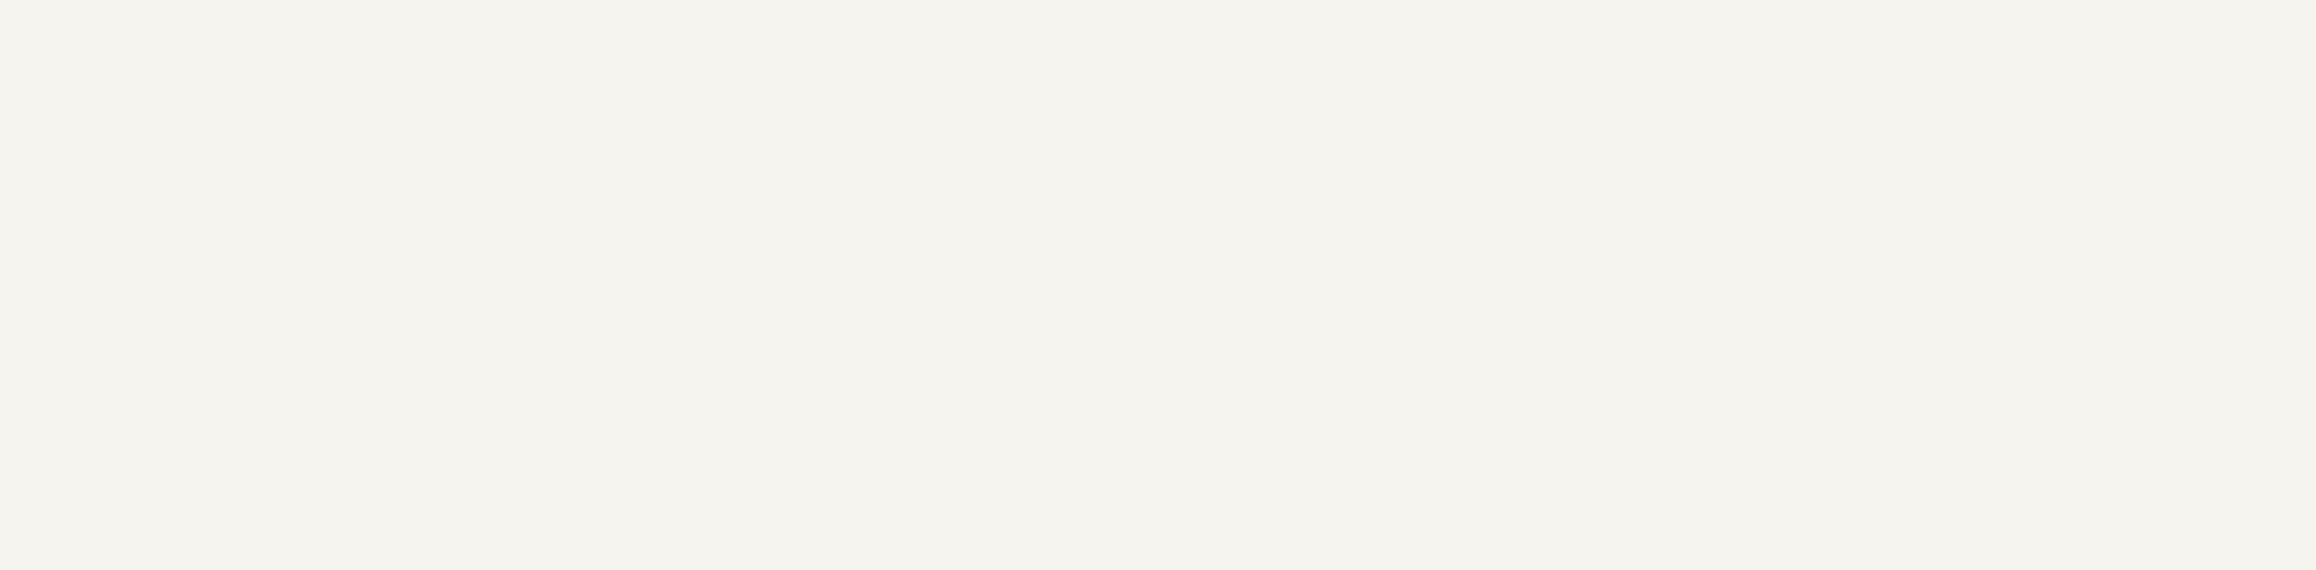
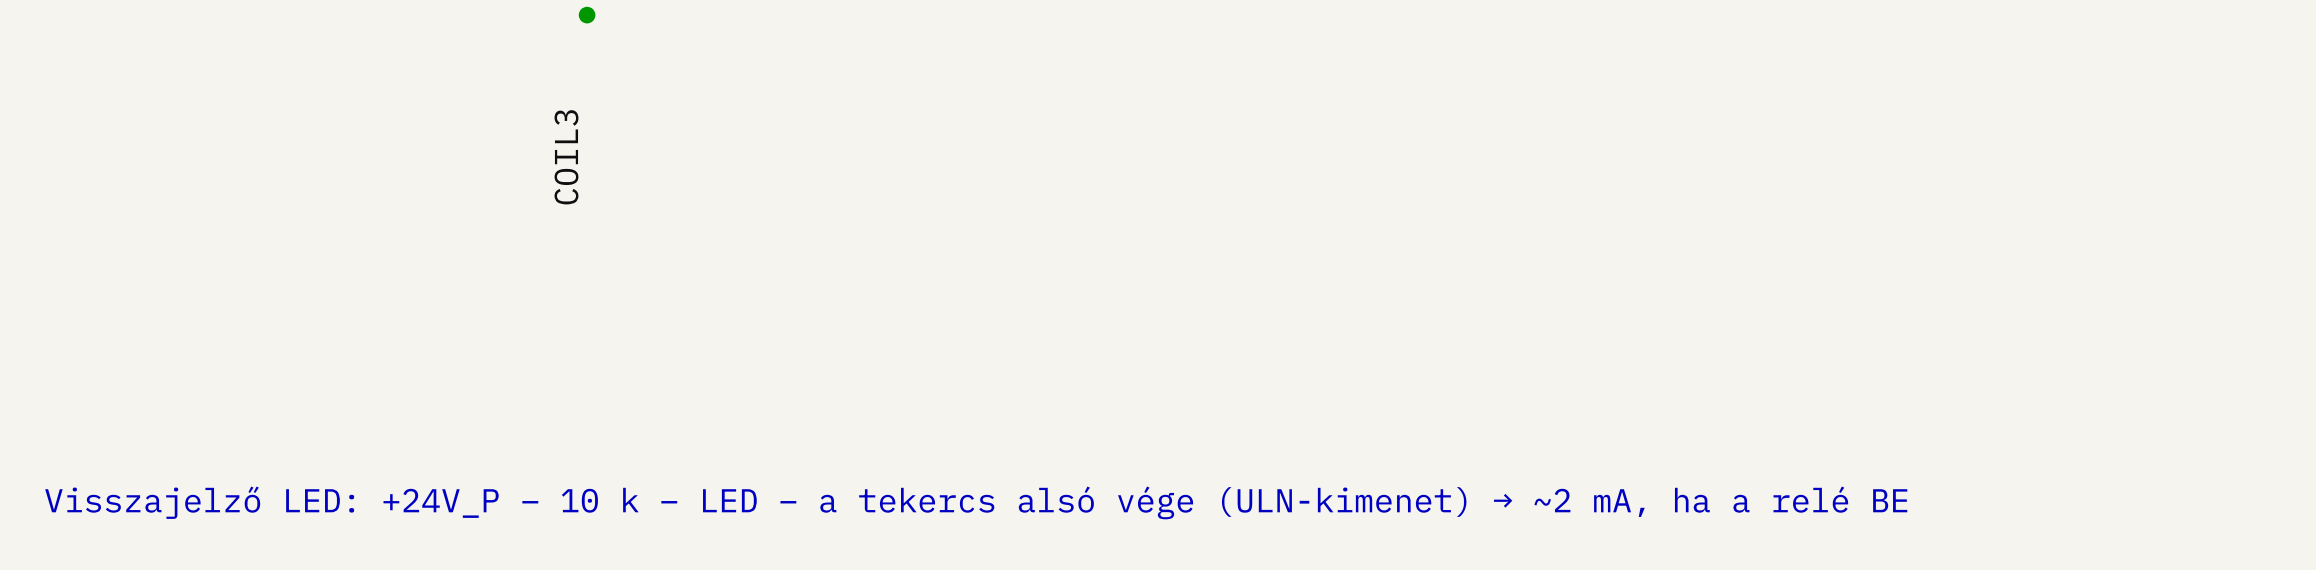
junction: none -> (587, 15)
label: none -> COIL3 (566, 157)
text: none -> Visszajelző LED: +24V_P – 10 k – LED – a tekercs alsó vége (ULN-kimenet) → ~2 mA, ha a relé BE (976, 502)

